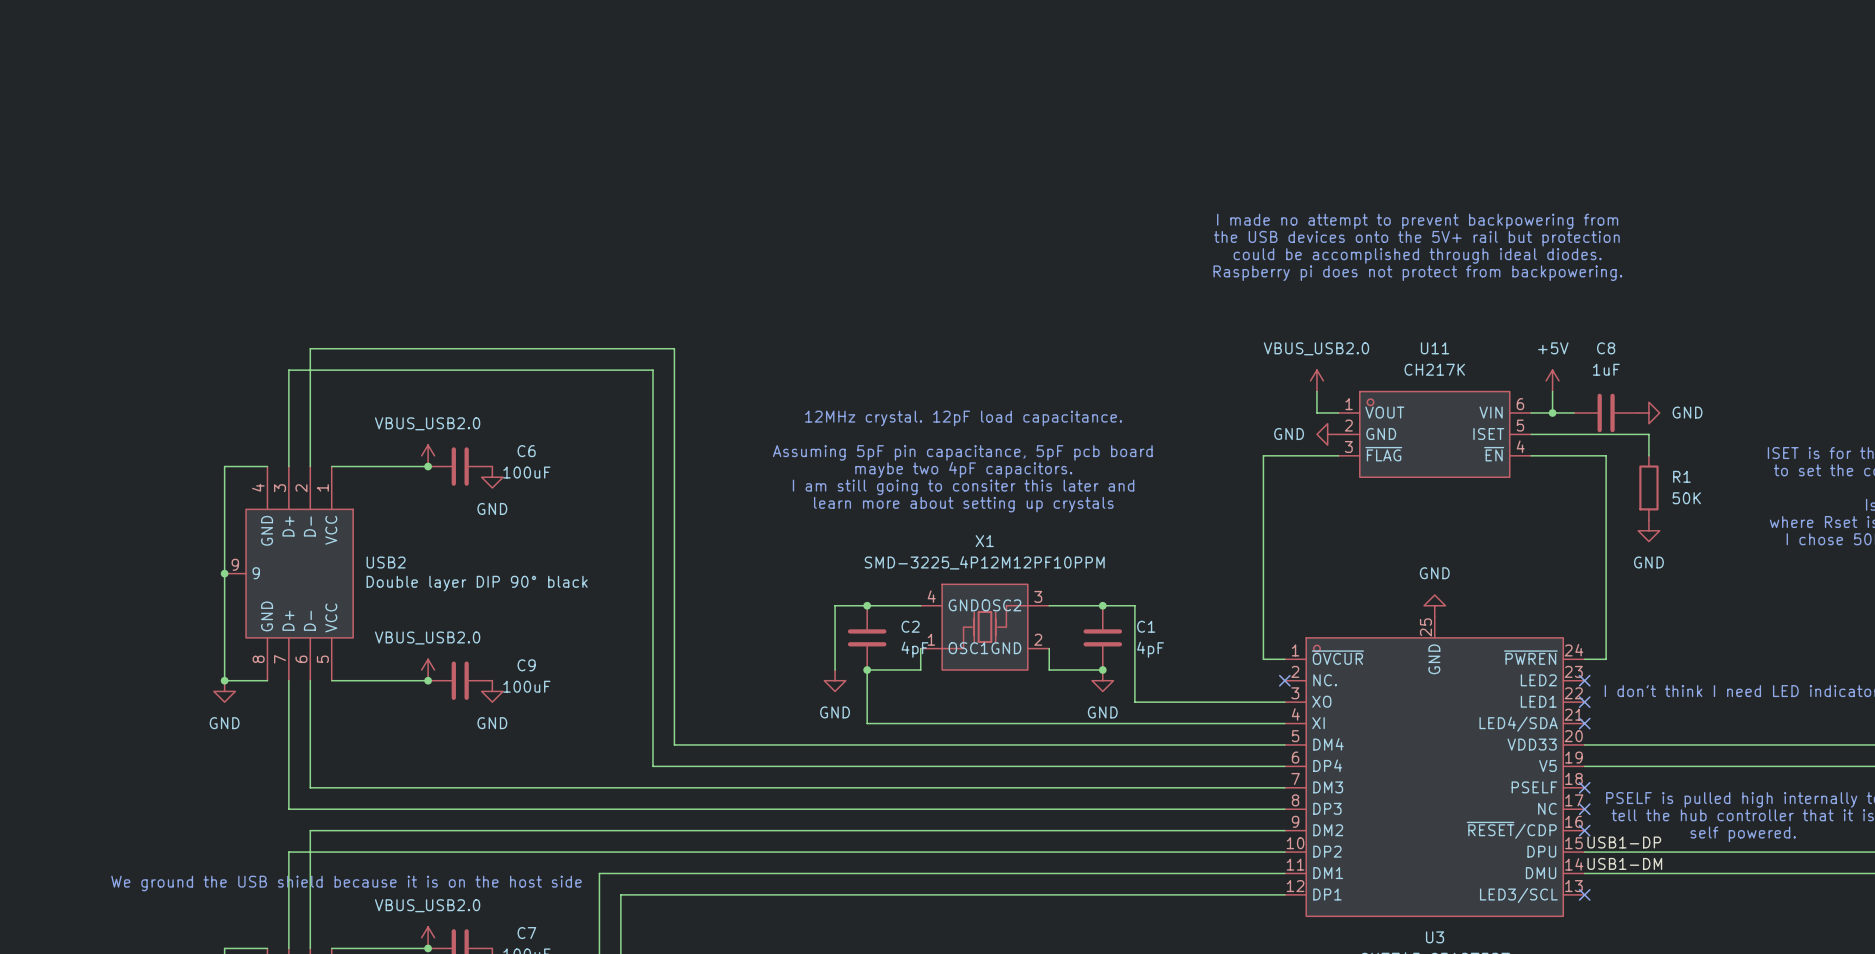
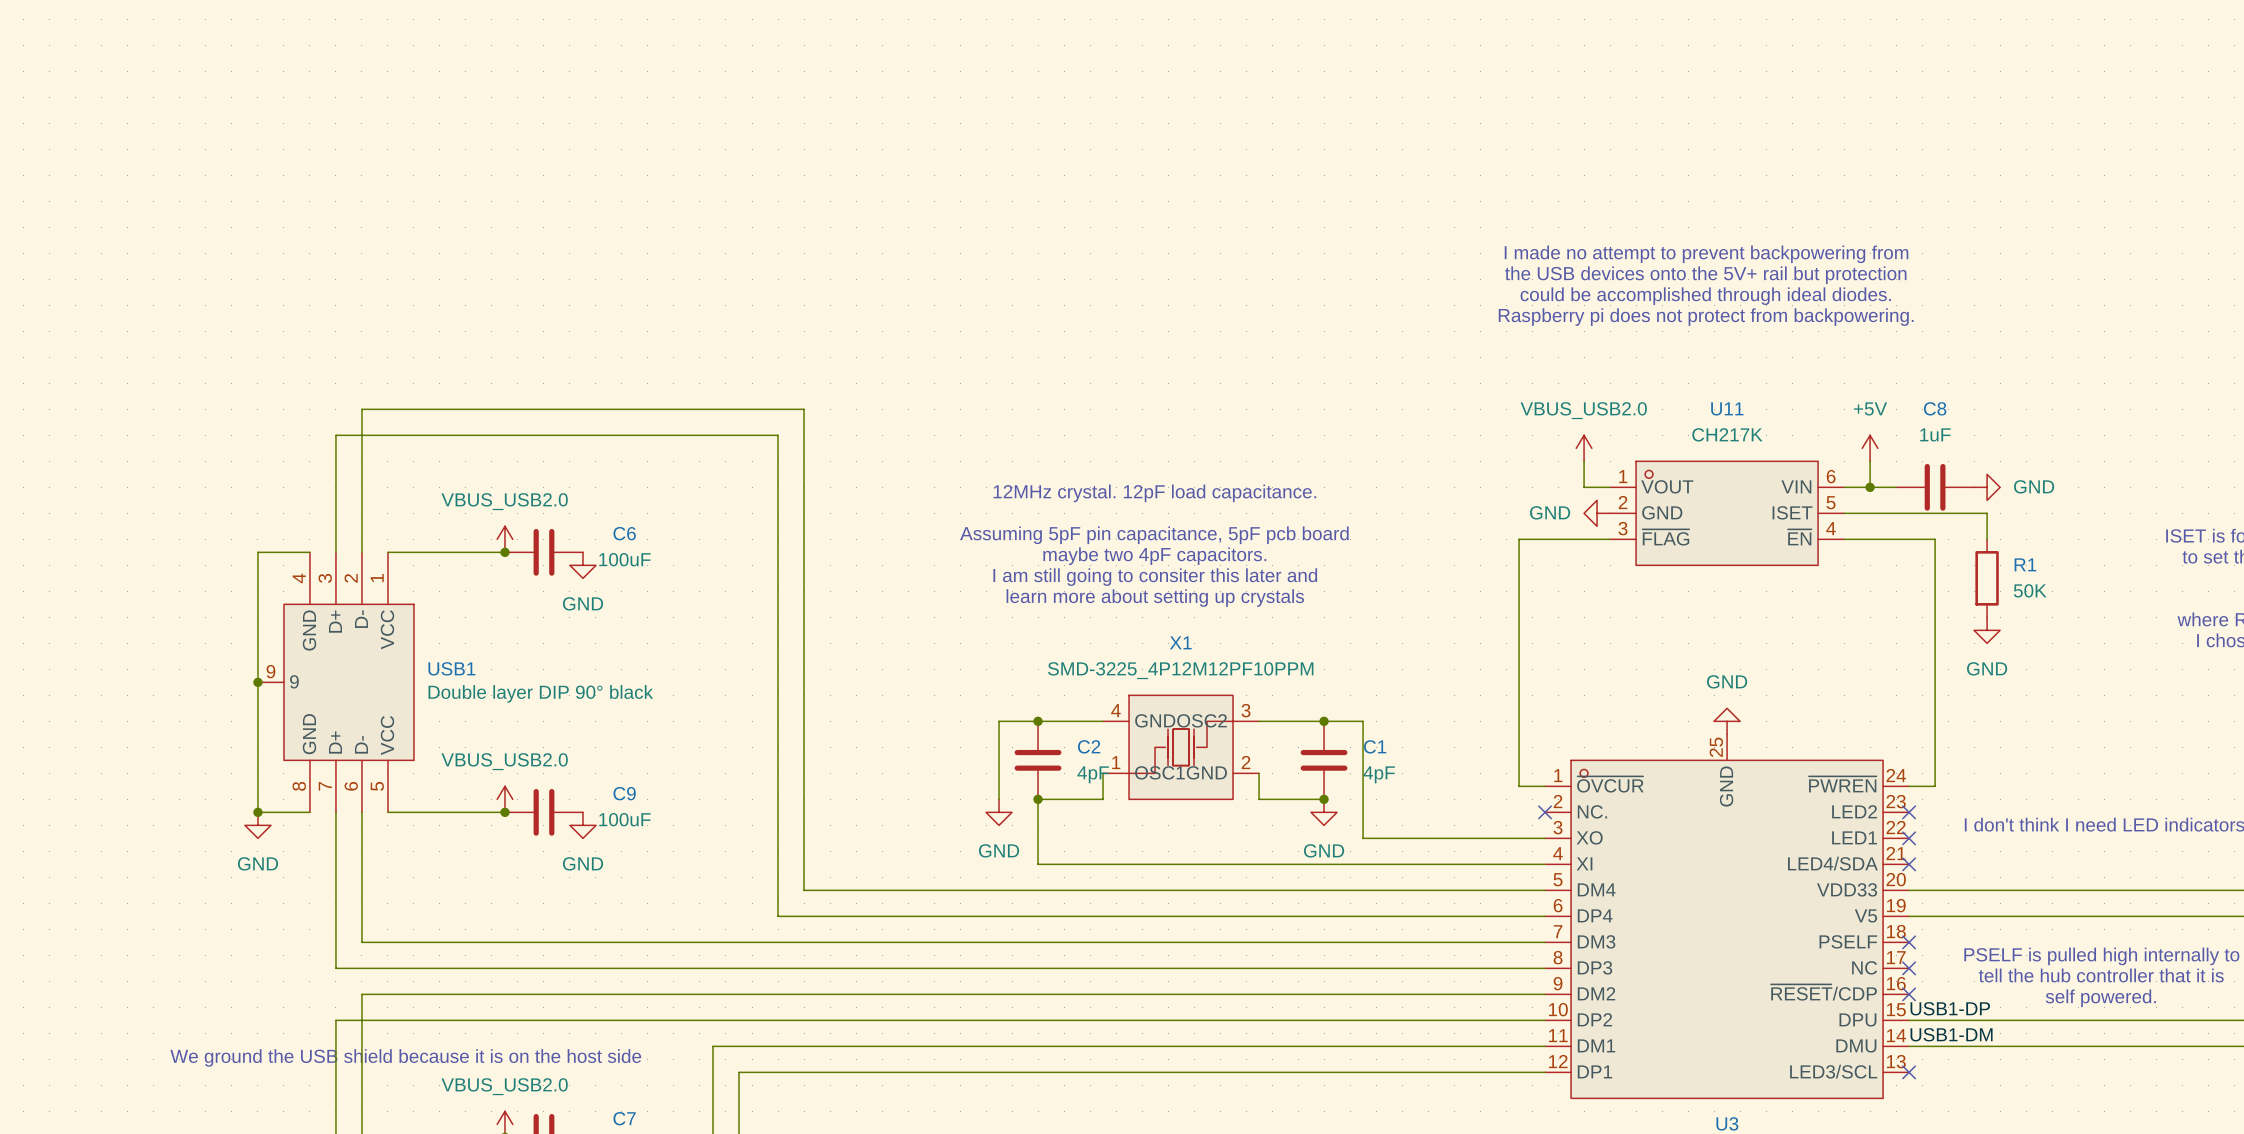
USB2 name: USB2 (386, 562) -> USB1 (451, 668)

